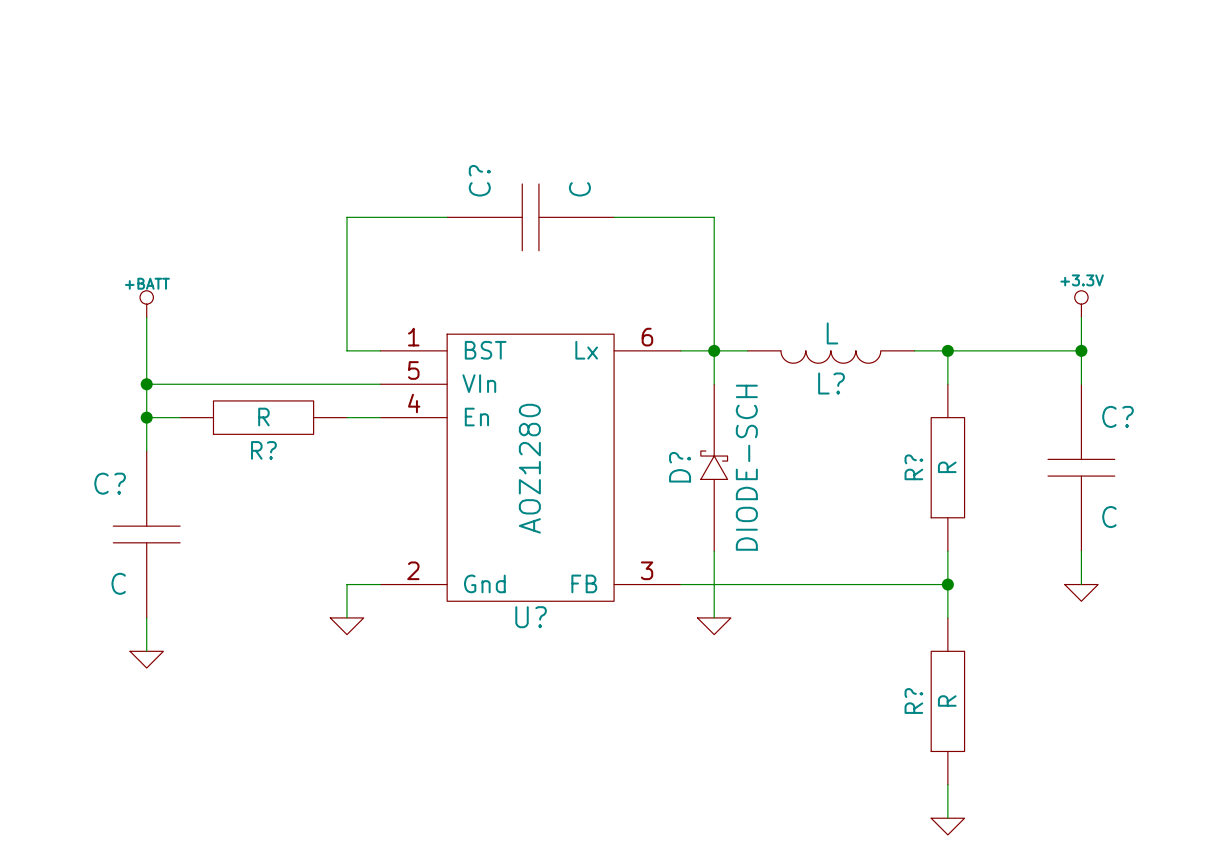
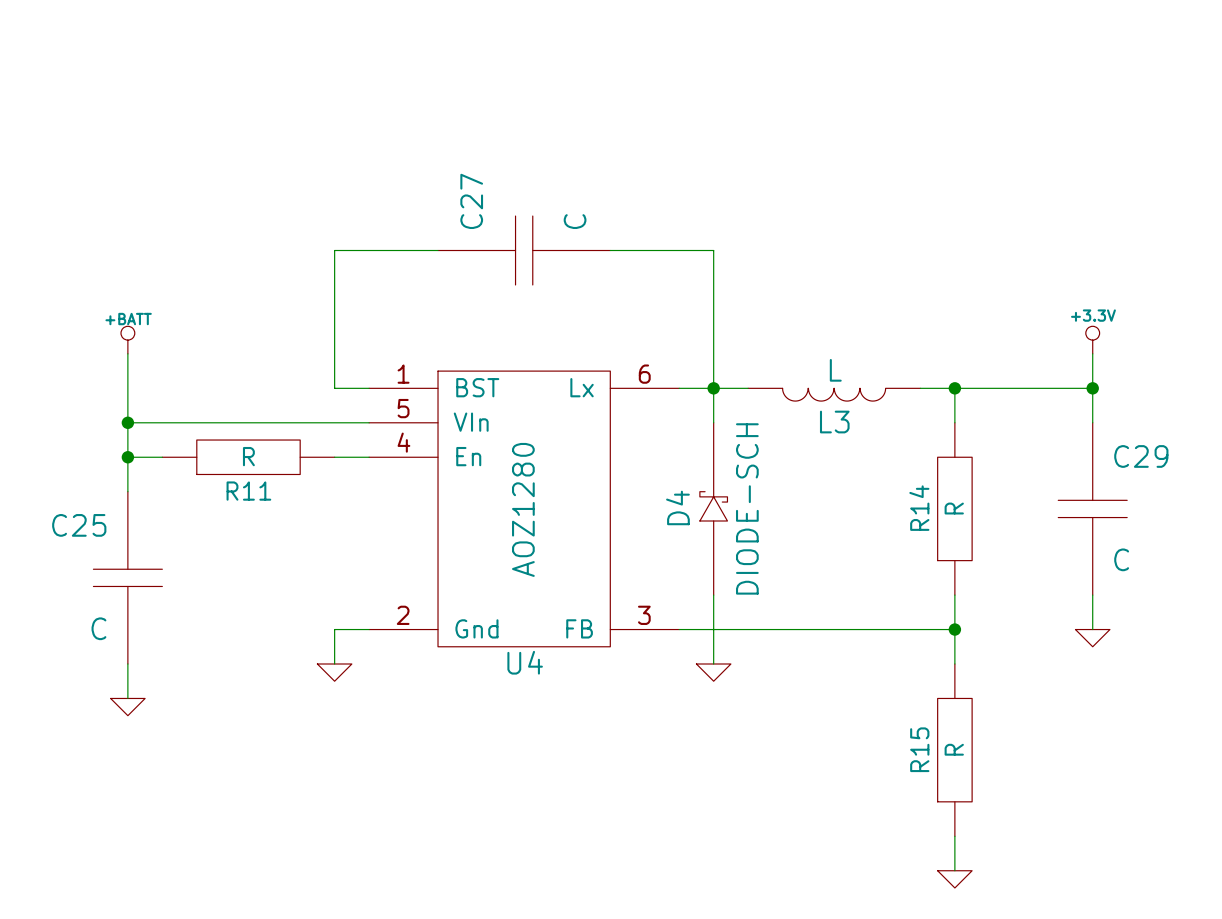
C? name: C? (479, 180) -> C27 (471, 201)
L? name: L? (831, 383) -> L3 (834, 422)
C? name: C? (1118, 416) -> C29 (1141, 456)
R? name: R? (263, 450) -> R11 (248, 491)
D? name: D? (680, 467) -> D4 (677, 507)
R? name: R? (913, 467) -> R14 (919, 508)
C? name: C? (110, 483) -> C25 (79, 525)
U? name: U? (531, 617) -> U4 (525, 662)
R? name: R? (913, 700) -> R15 (919, 749)

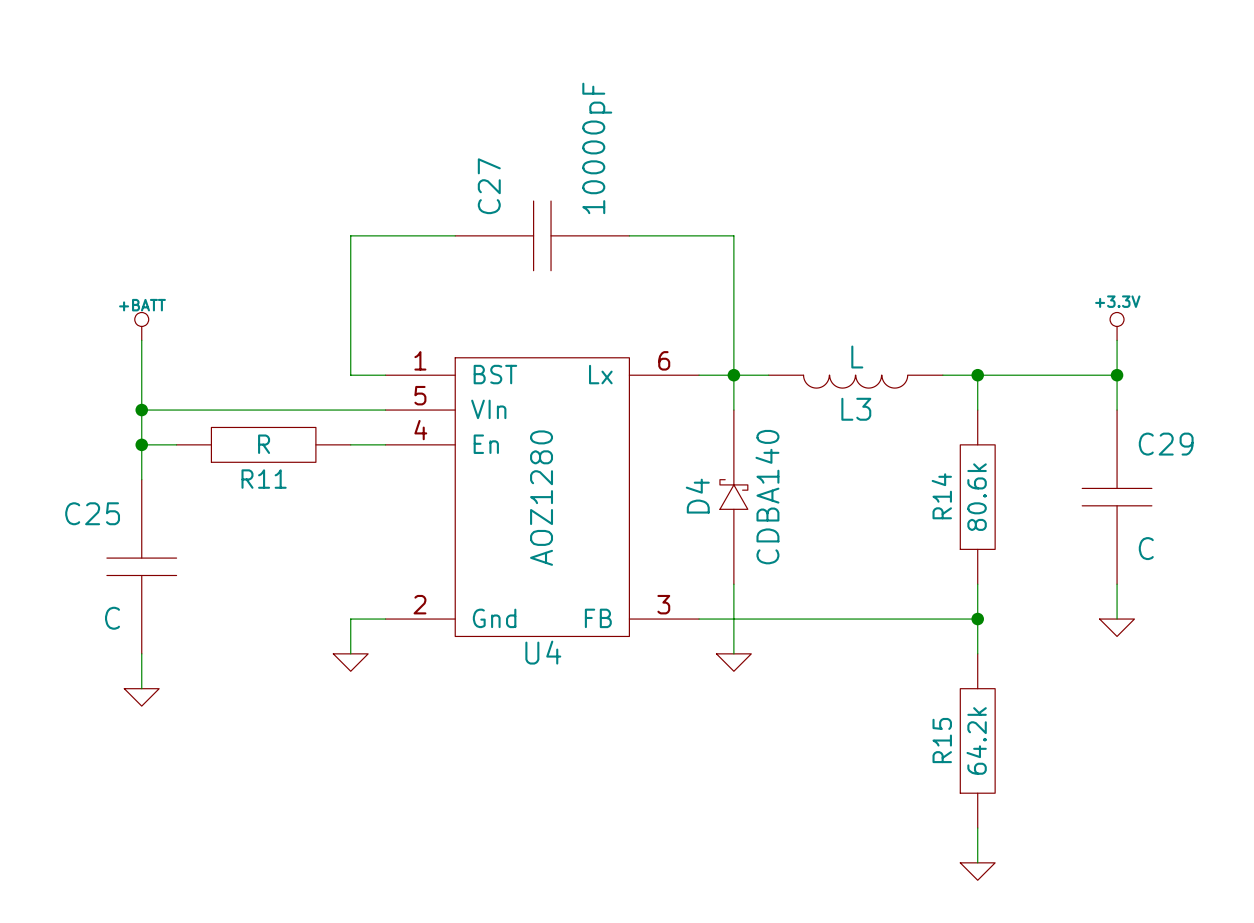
C27 value: C (575, 221) -> 10000pF (597, 148)
D4 value: DIODE-SCH (747, 508) -> CDBA140 (767, 497)
R14 value: R (954, 508) -> 80.6k (977, 497)
R15 value: R (954, 749) -> 64.2k (976, 740)

